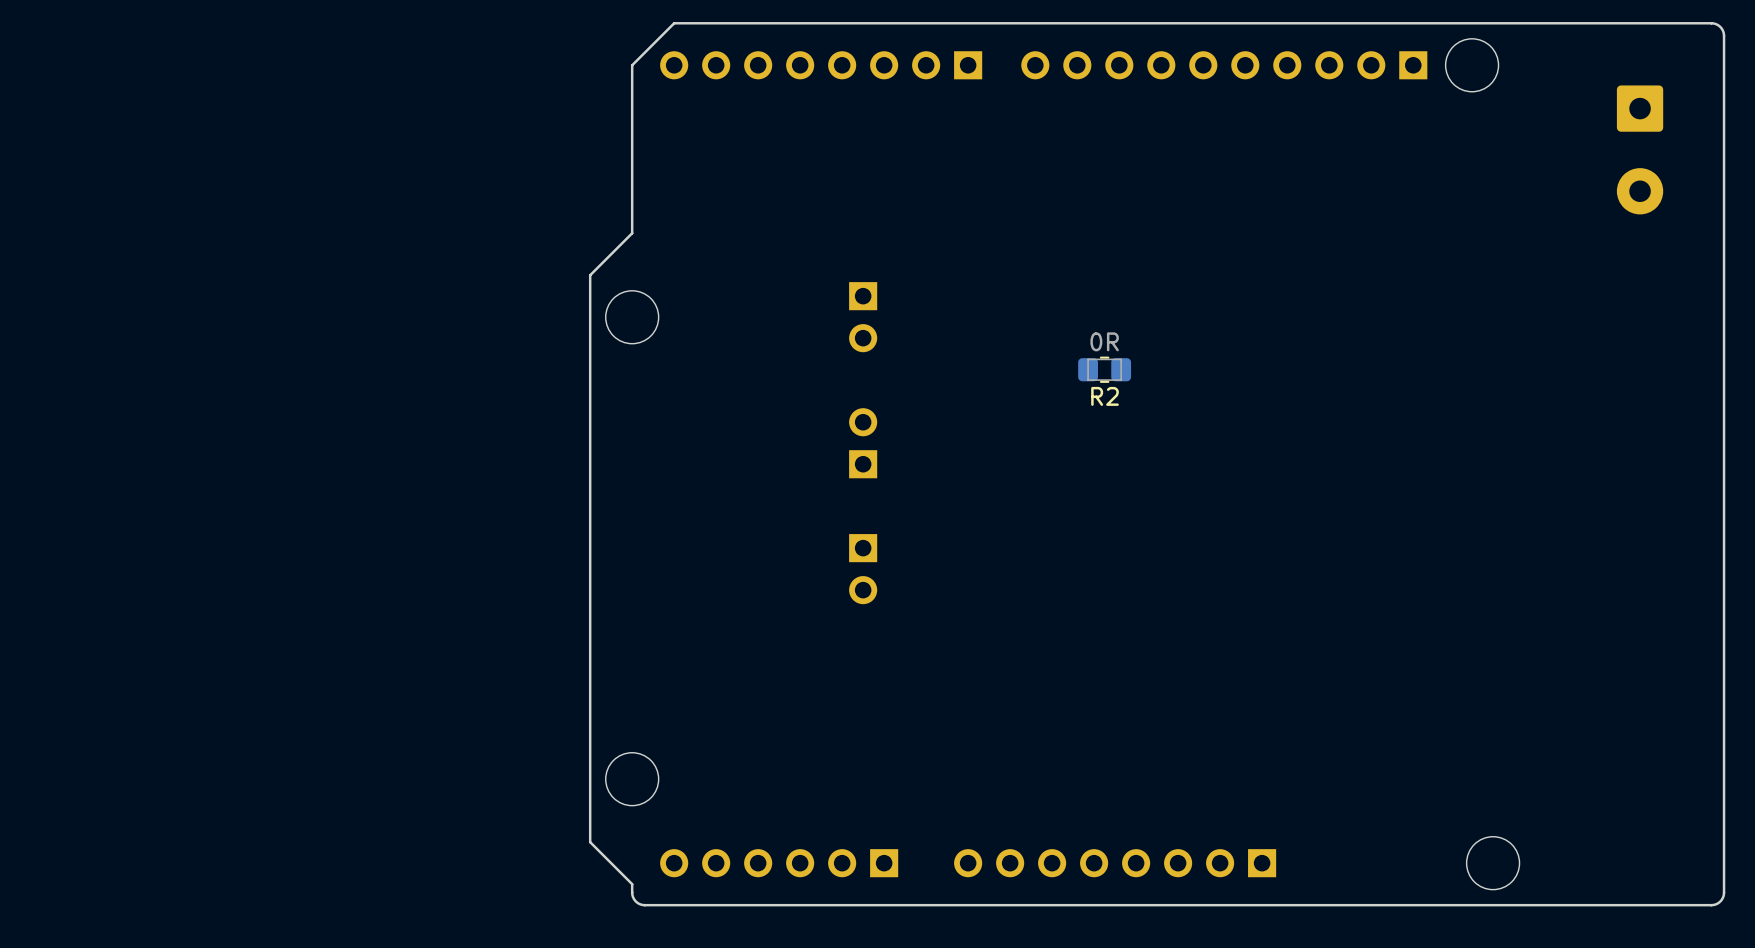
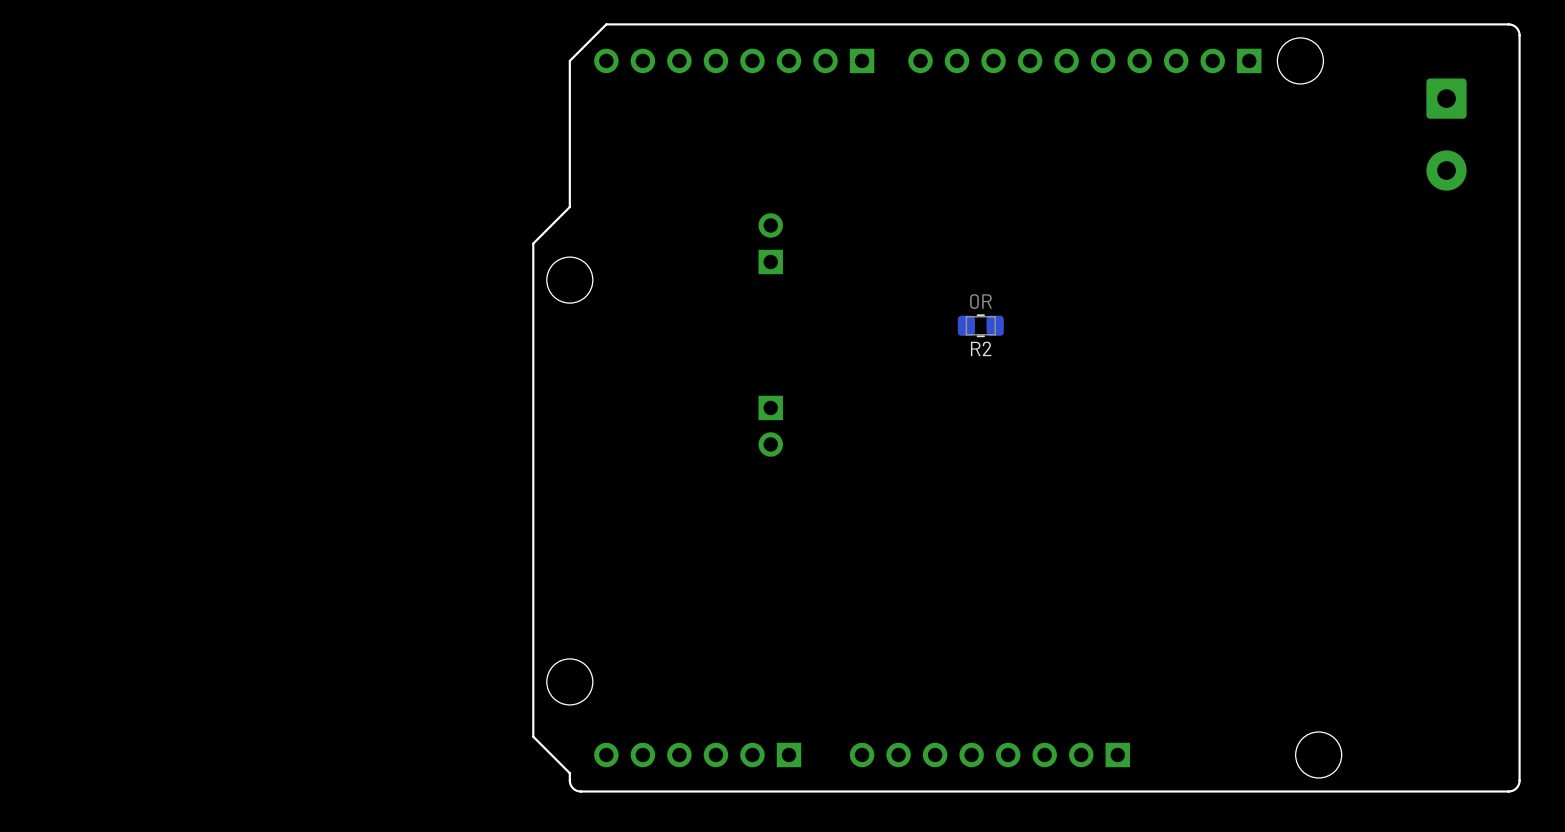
part rotation: 0° (863, 317) -> 180° (770, 243)
part: (863, 443) -> none
part: none -> (770, 426)
part: (863, 569) -> none

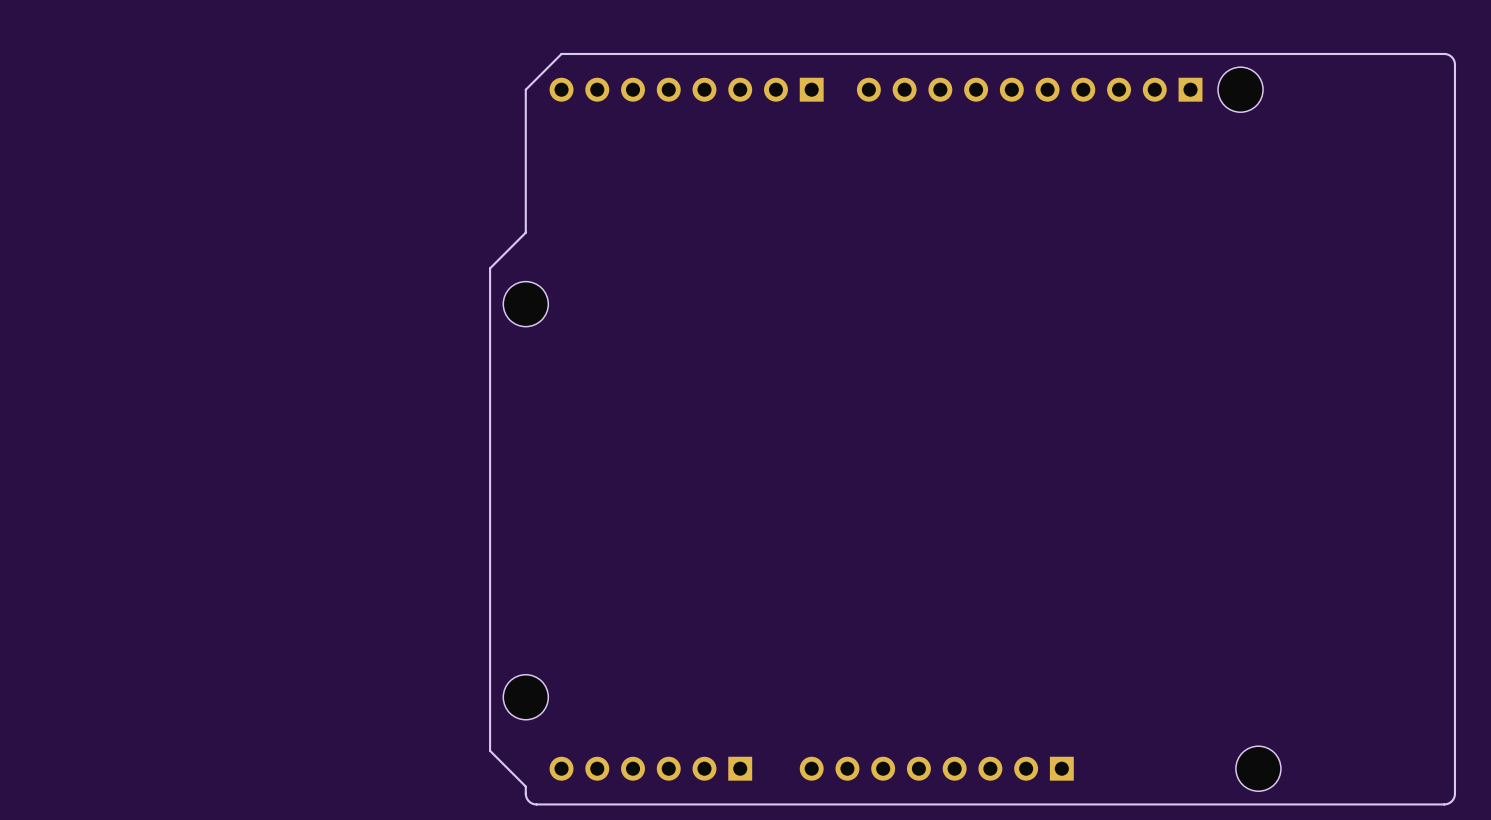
part: (1446, 134) -> none
part: (770, 243) -> none
R2: 0R (980, 325) -> none
part: (770, 426) -> none

